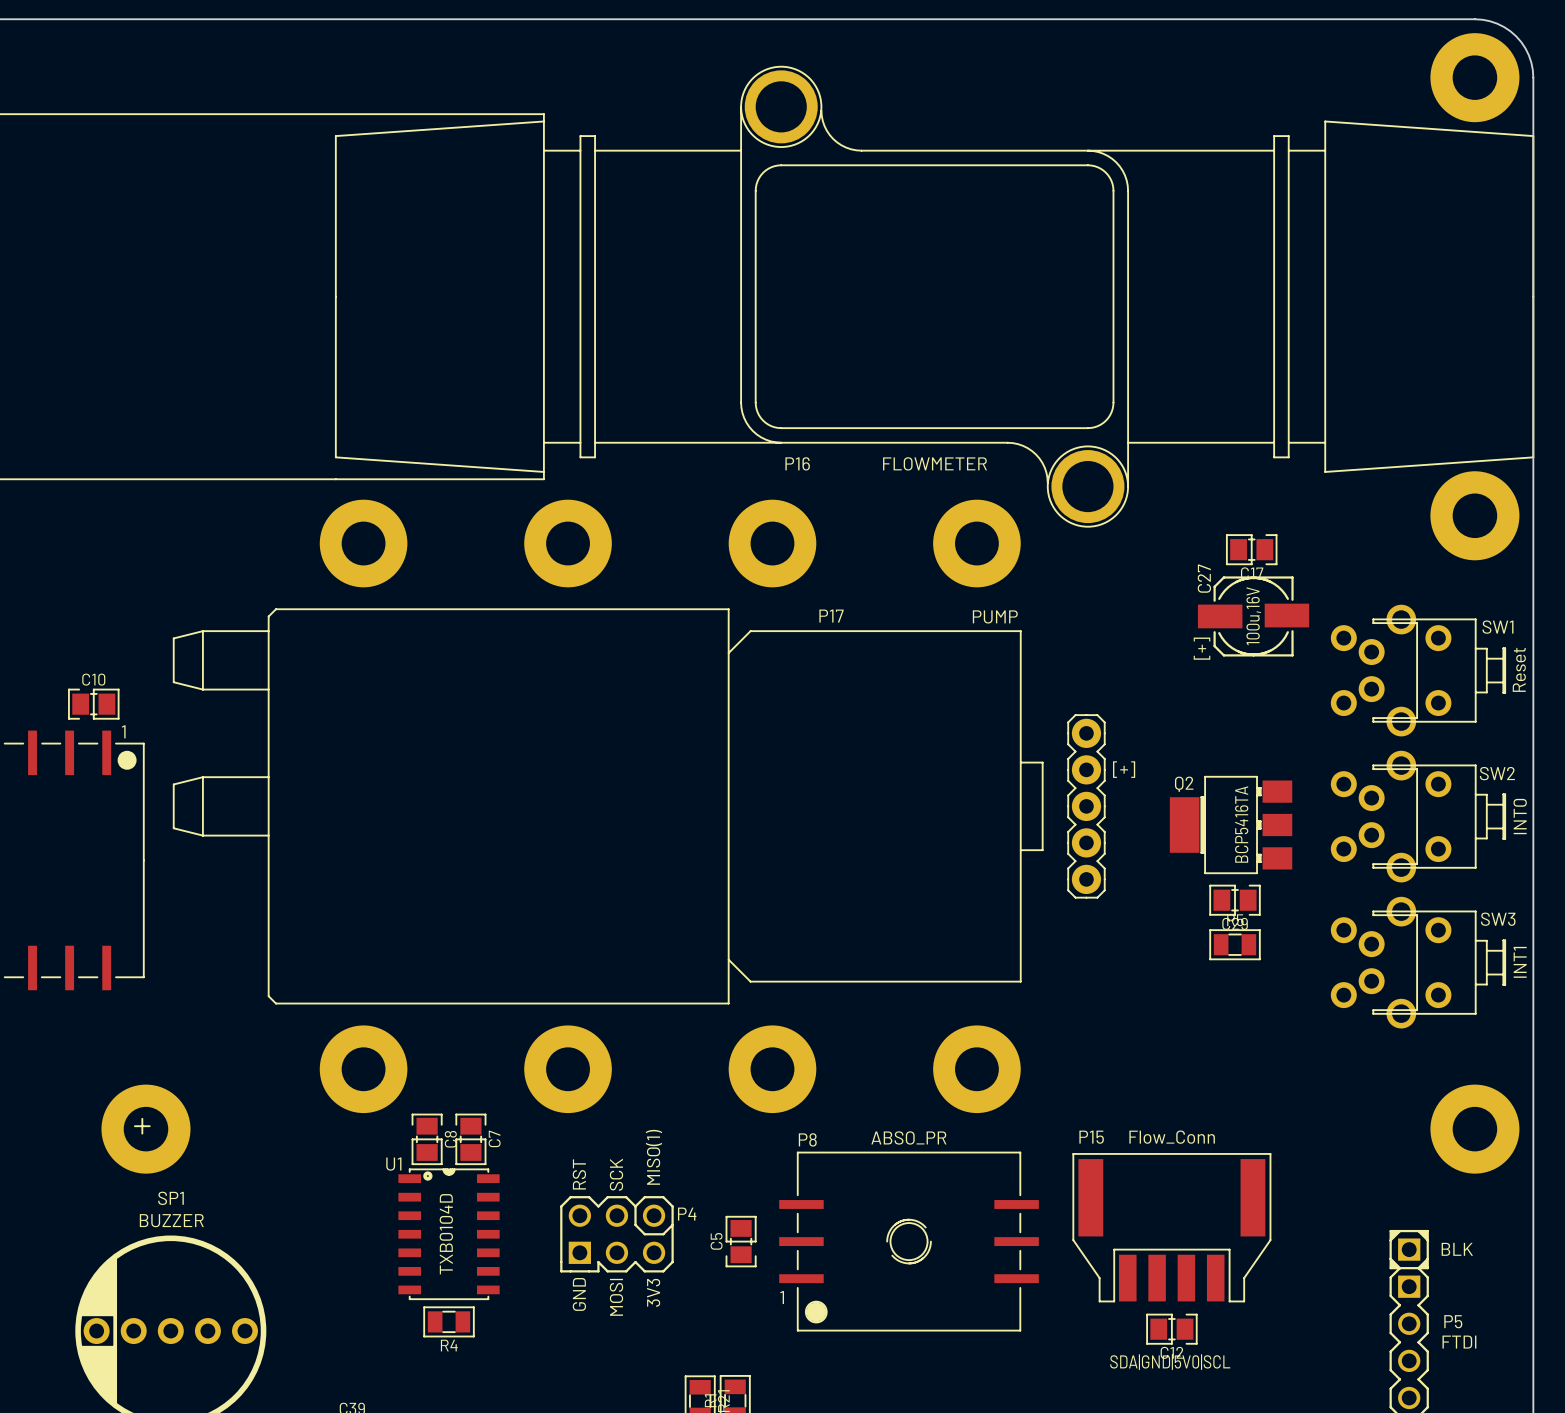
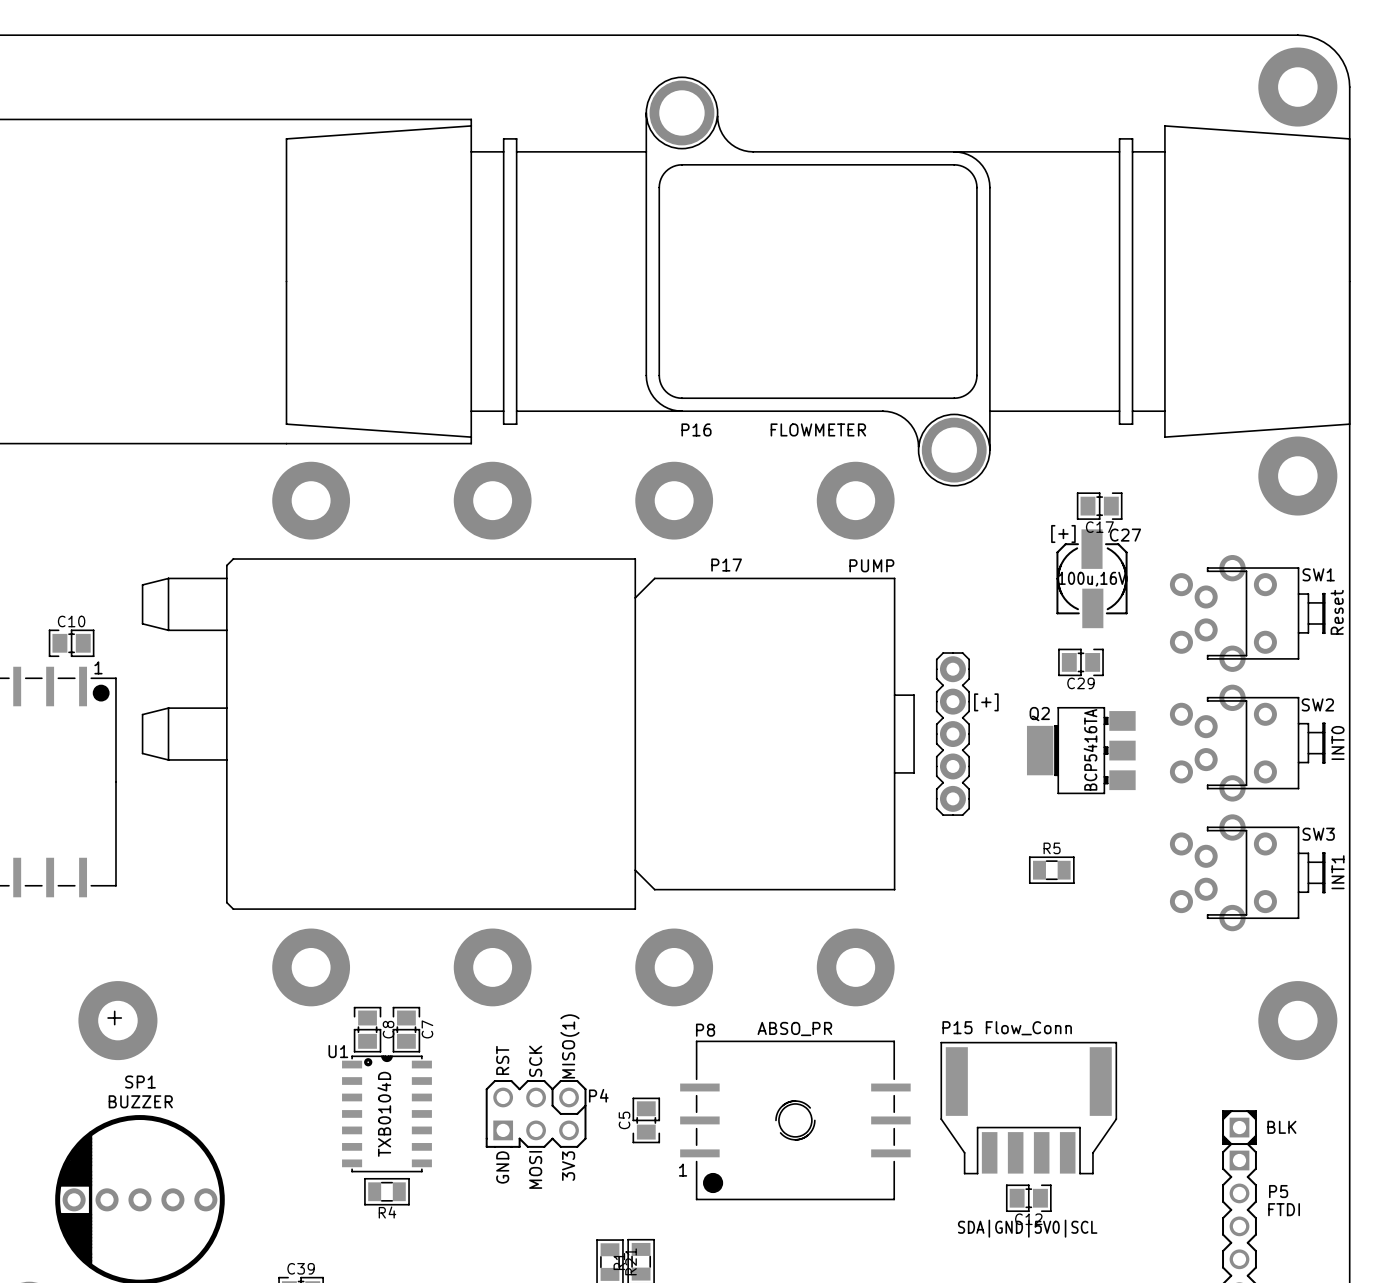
C27 rotation: 0° (1253, 616) -> 90° clockwise (1092, 578)
C29 position: (1235, 900) -> (1080, 662)
R5 position: (1235, 944) -> (1051, 870)

